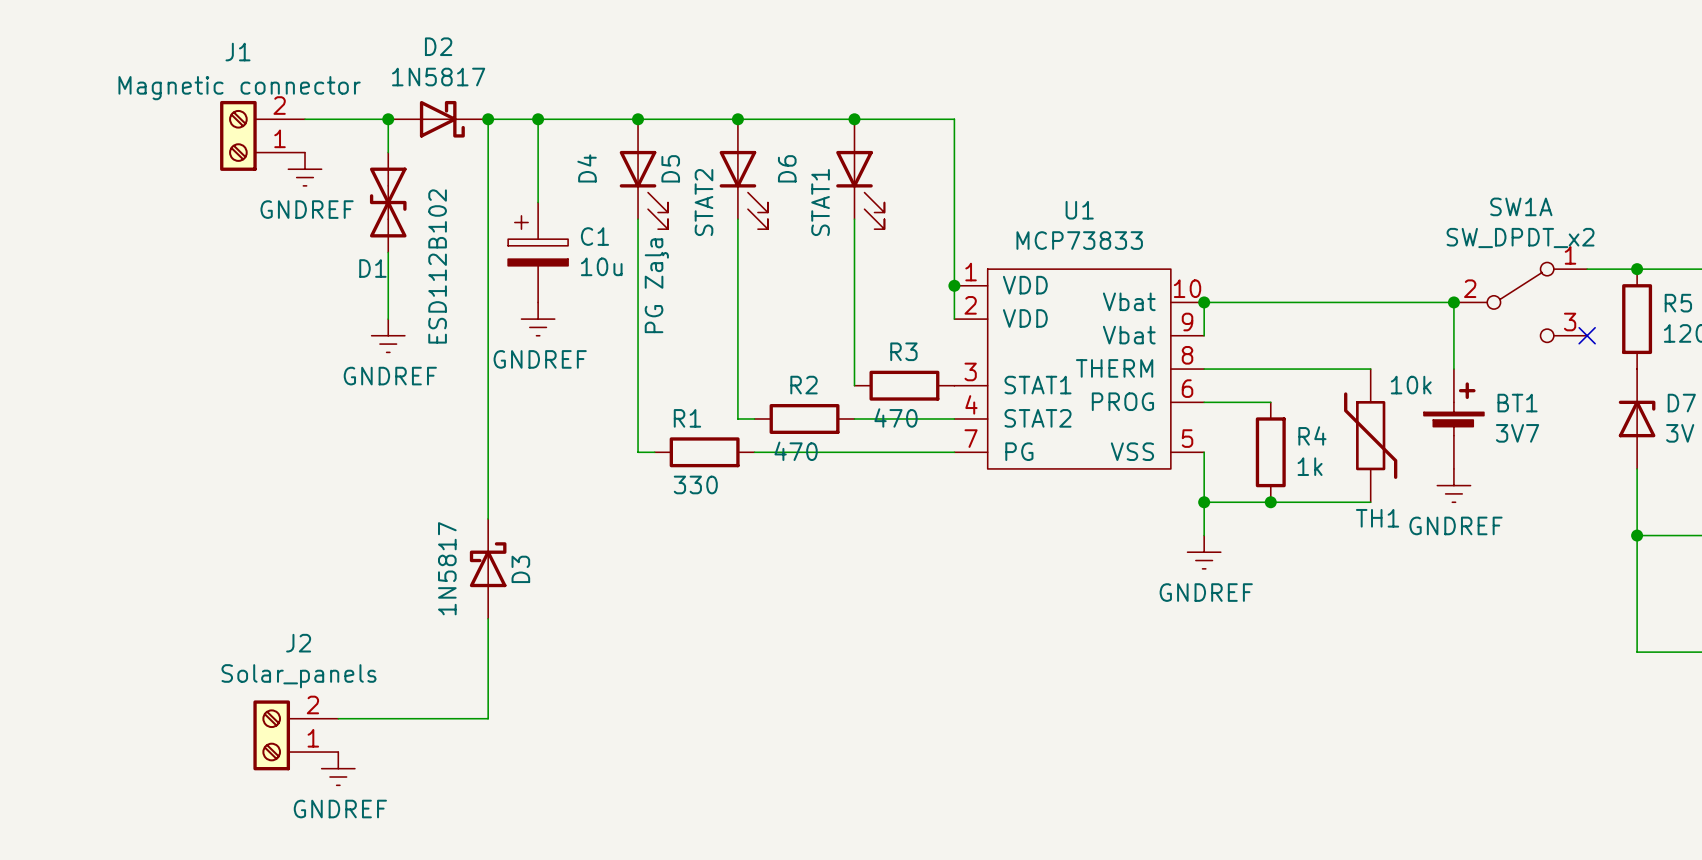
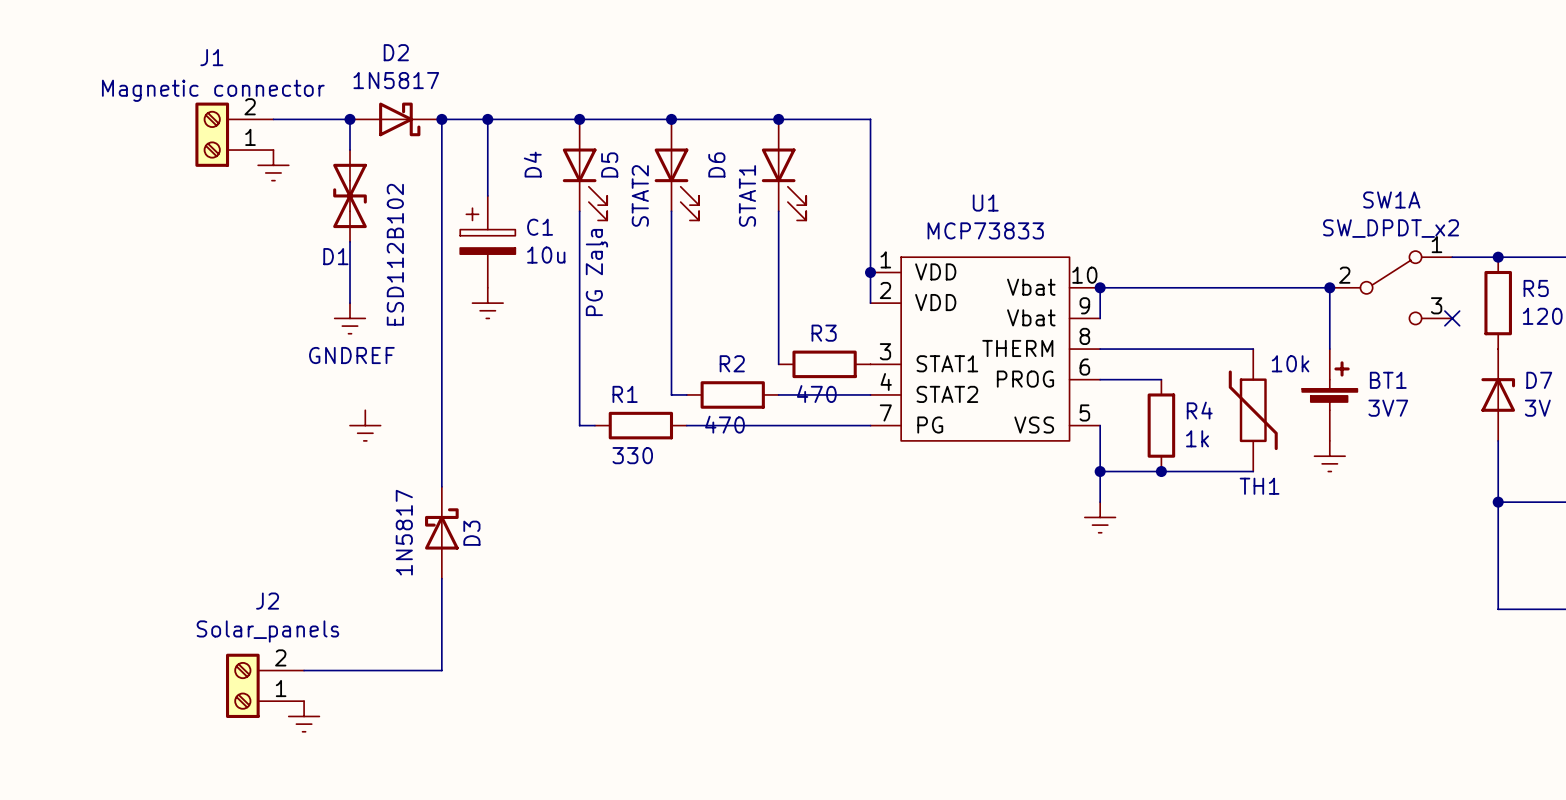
power symbol text: GNDREF (307, 209) -> none
power symbol text: GNDREF (540, 359) -> none
power symbol: none -> (365, 425)
power symbol text: GNDREF (1456, 525) -> none
power symbol text: GNDREF (1206, 592) -> none
power symbol text: GNDREF (340, 809) -> none

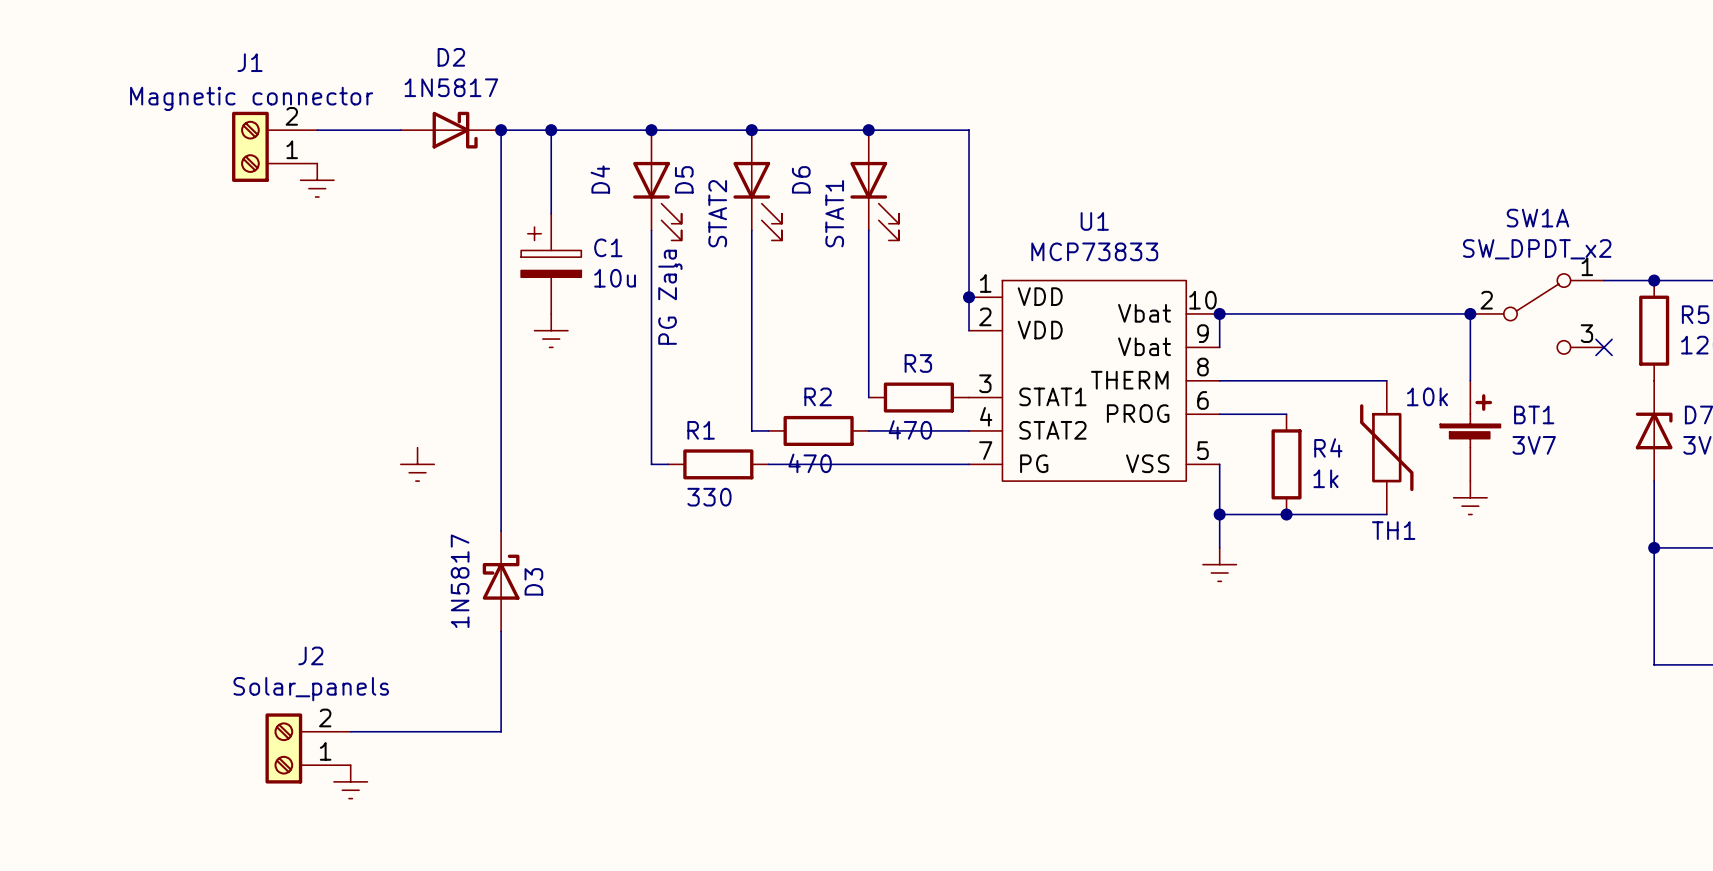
wire: (350, 119) (350, 150) -> none
junction: (350, 119) -> none
D1: ESD112B102 (350, 195) -> none
wire: (350, 241) (350, 303) -> none
power symbol: GNDREF (350, 318) -> none

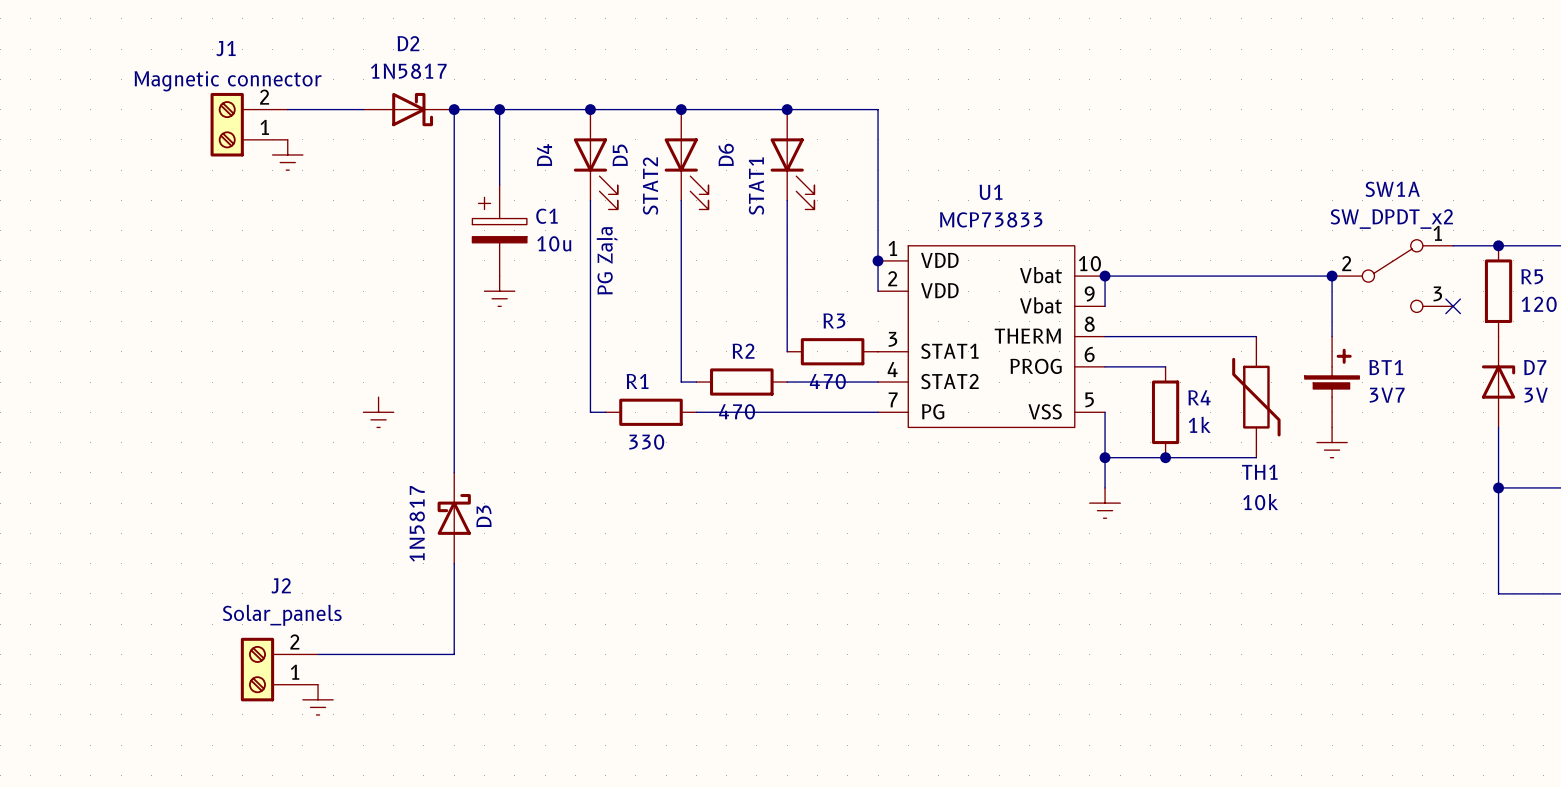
TH1 value position: 10k (1427, 396) -> 10k (1260, 502)

